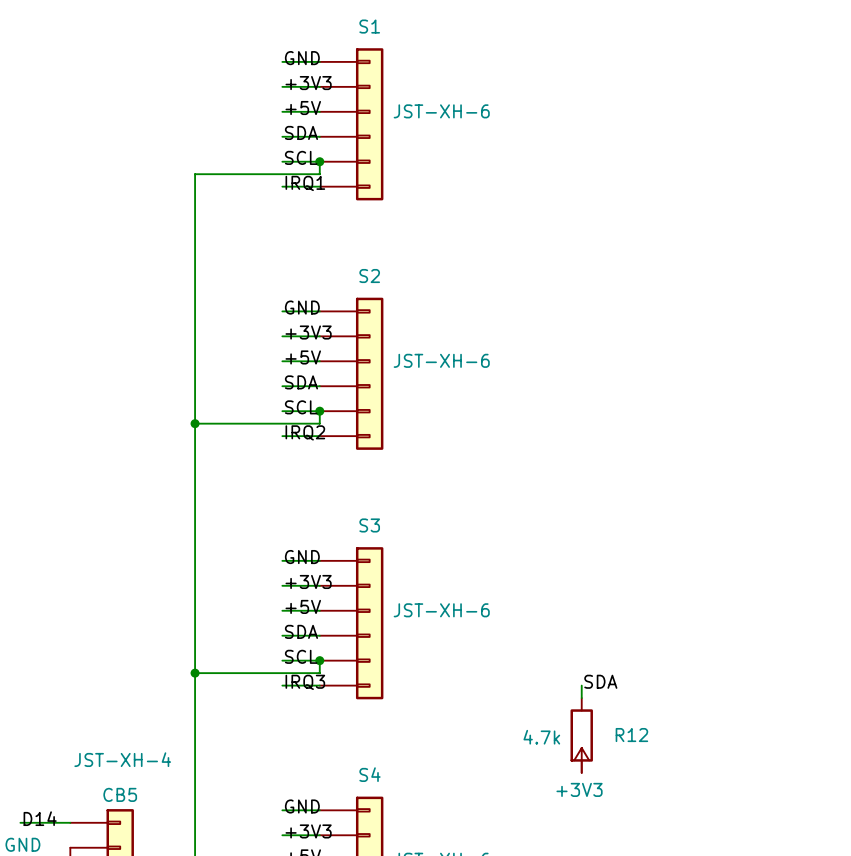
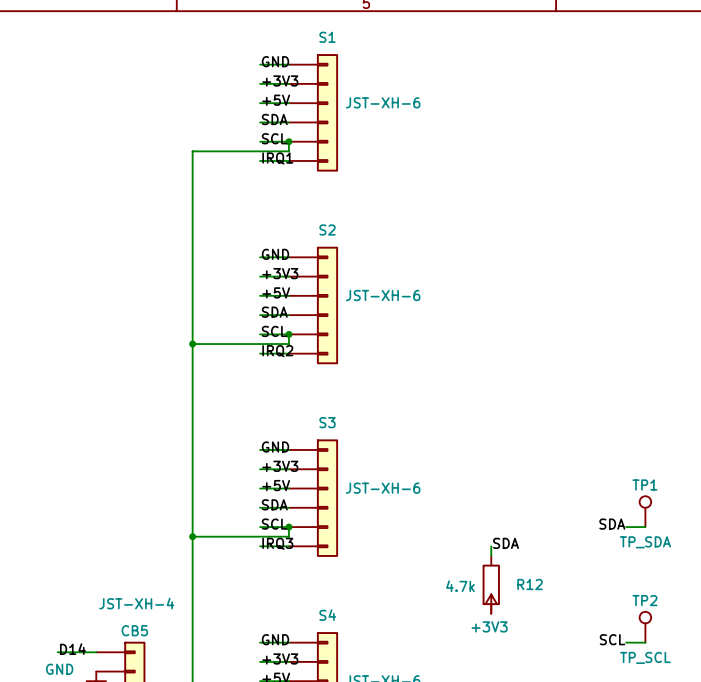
TP1: none -> TP_SDA (645, 511)
label: none -> SDA (612, 524)
wire: none -> (626, 527) (645, 527)
TP2: none -> TP_SCL (645, 627)
label: none -> SCL (612, 639)
wire: none -> (626, 642) (645, 642)

